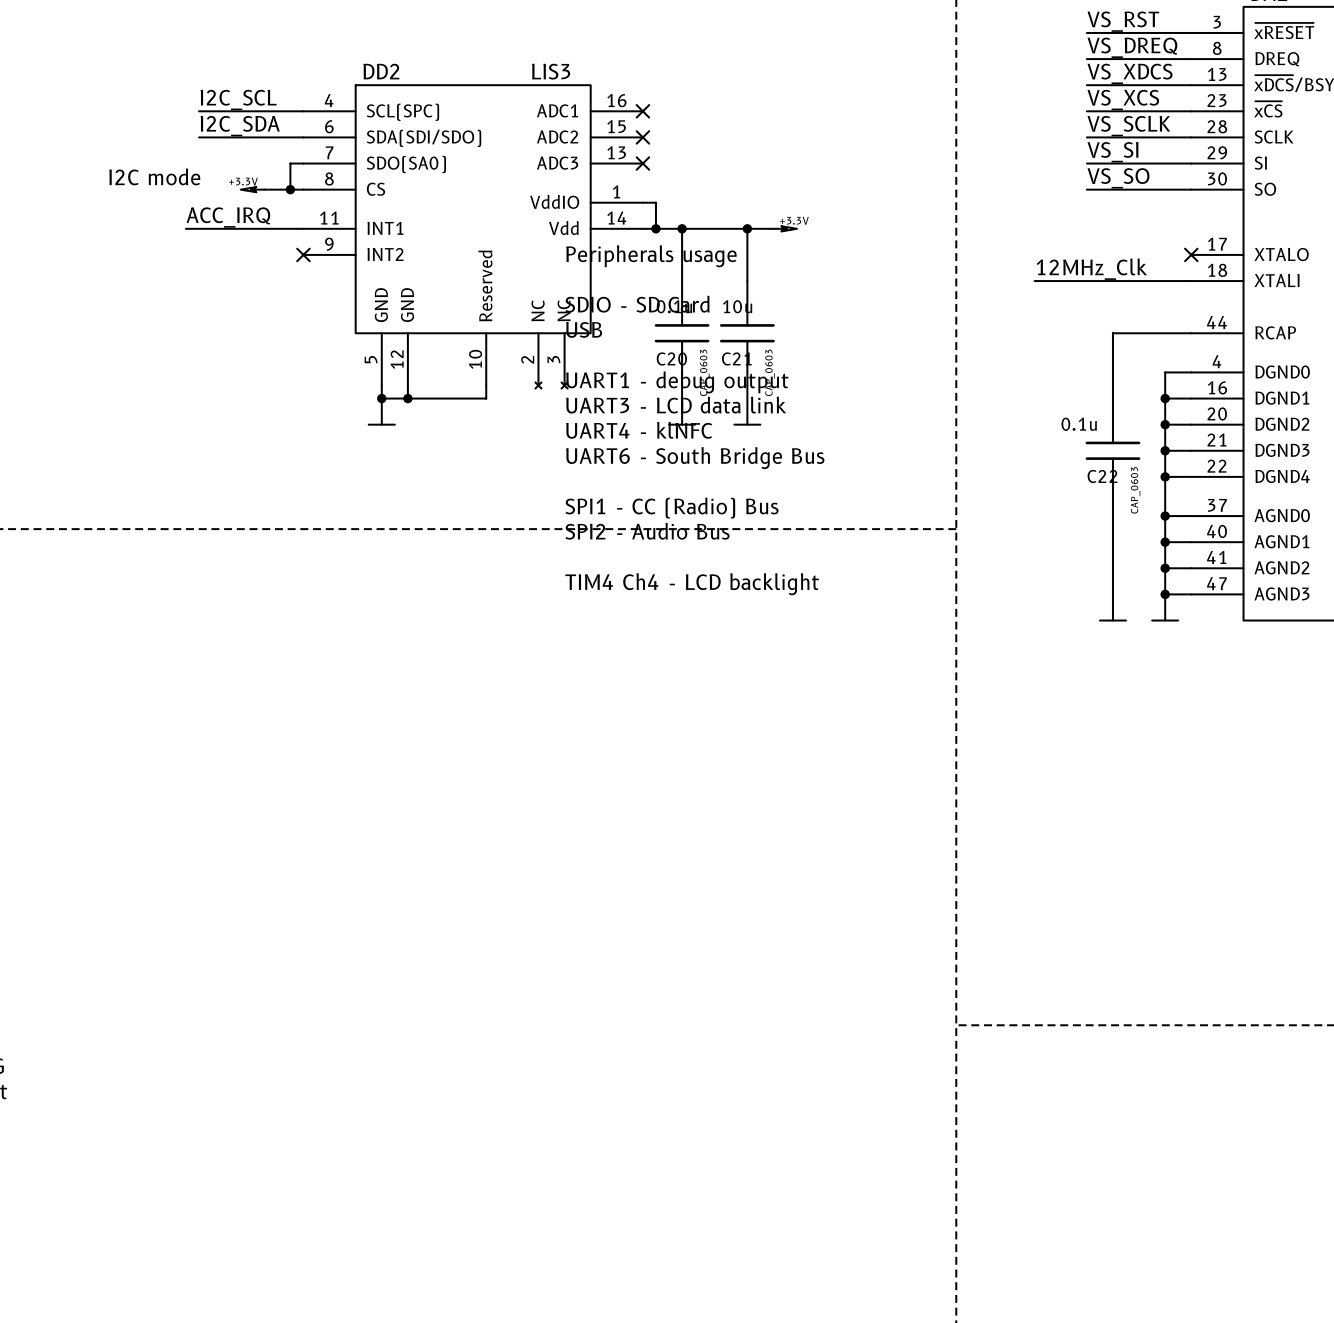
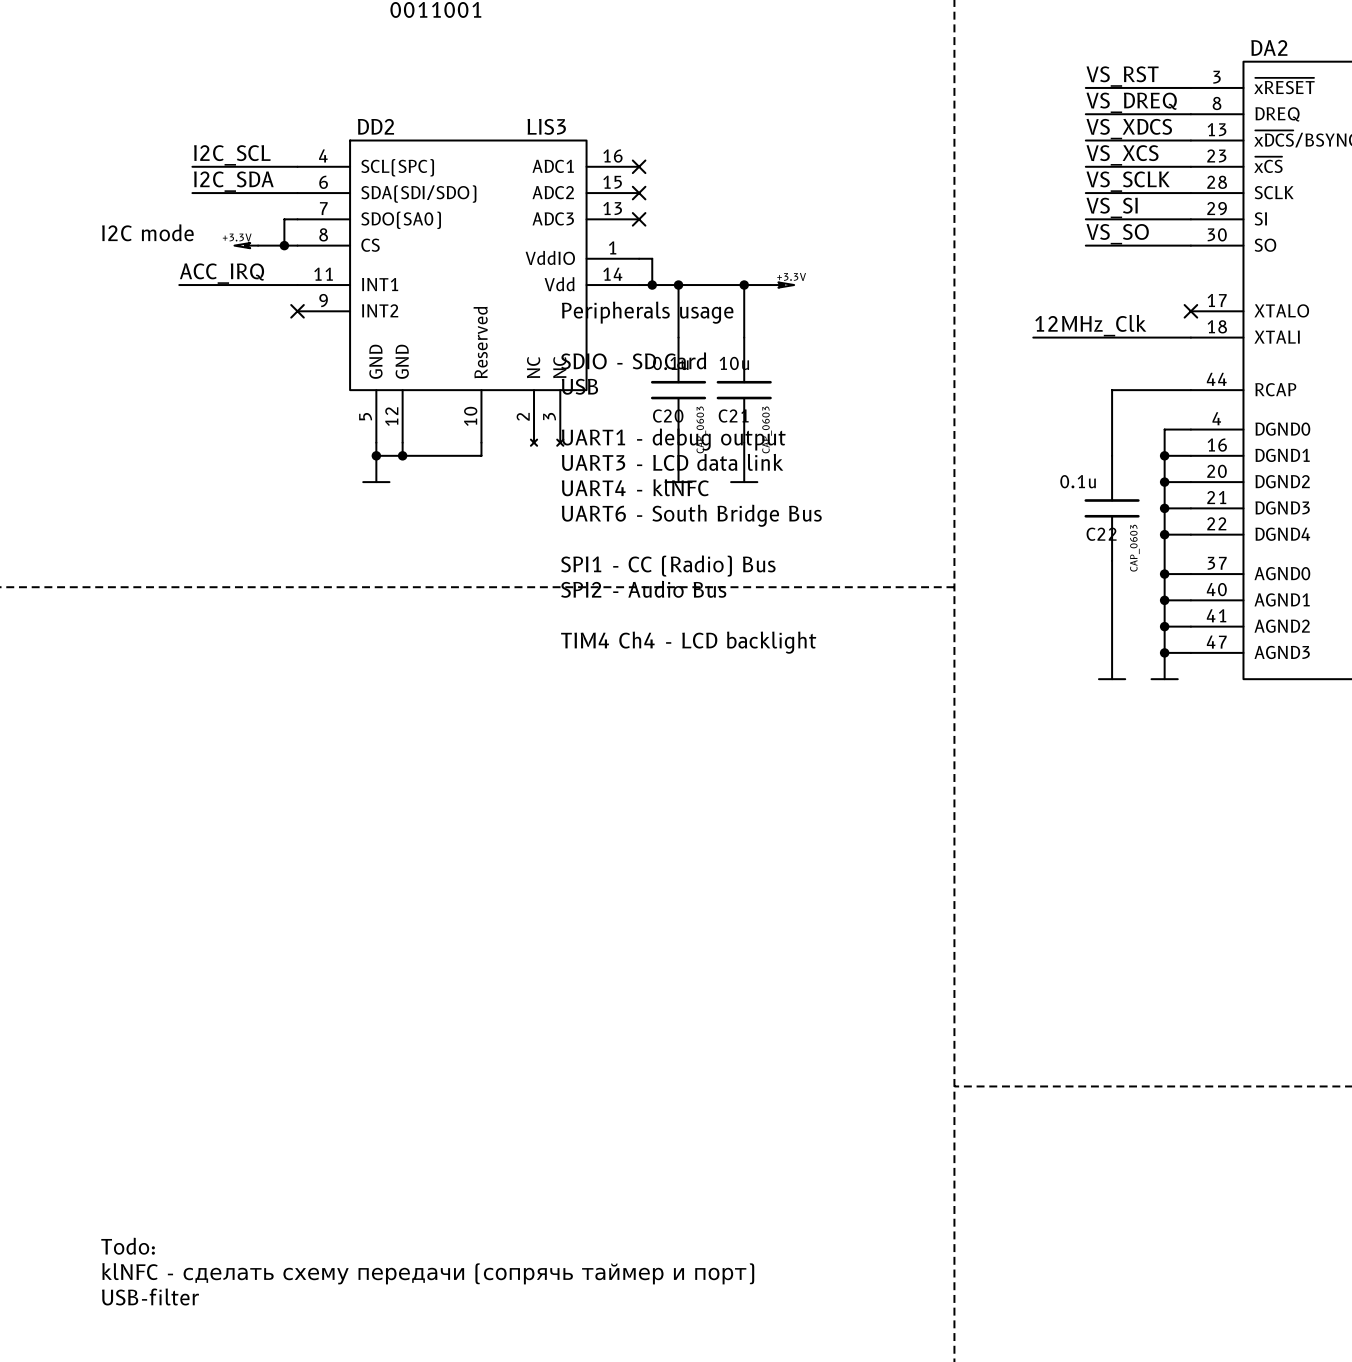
text: none -> Todo: (128, 1246)
text: none -> klNFC - сделать схему передачи (сопрячь таймер и порт) (428, 1273)
text: none -> USB-filter (150, 1296)

